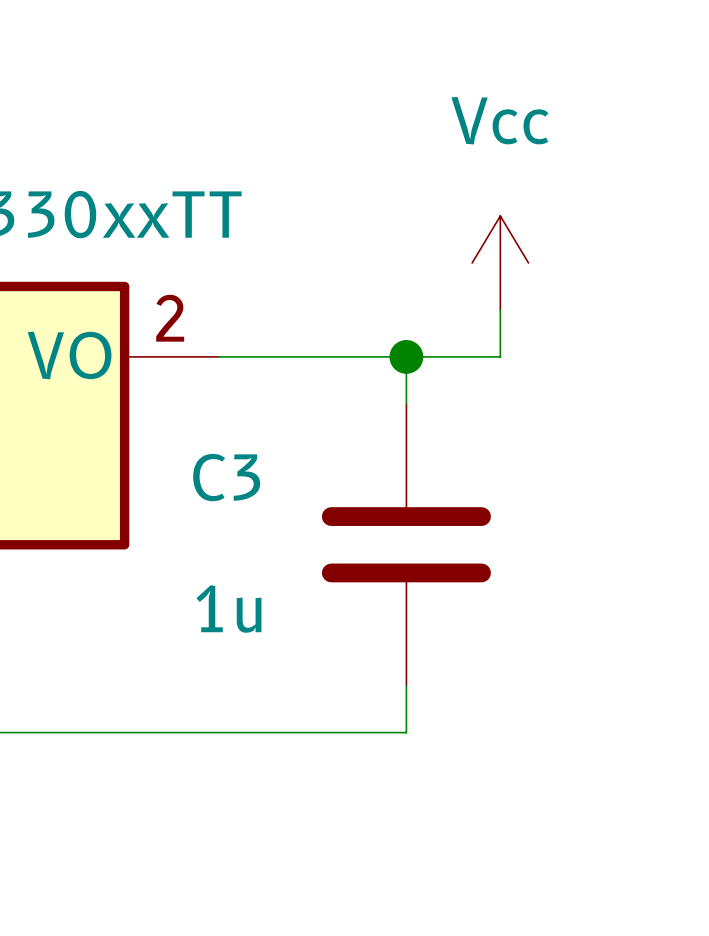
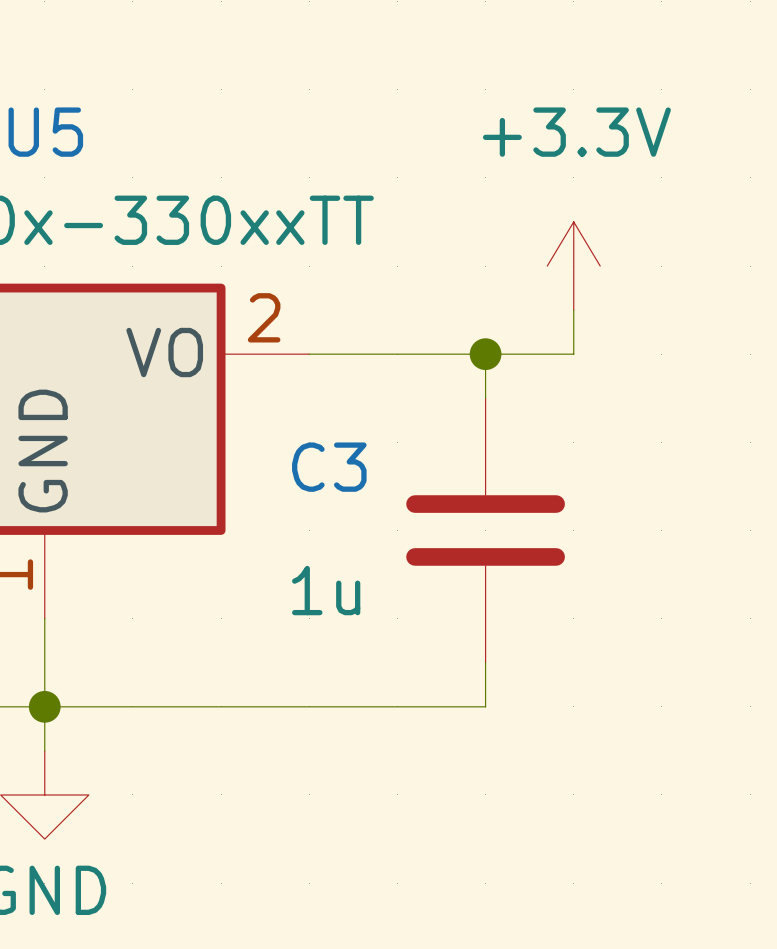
power symbol: Vcc (500, 262) -> +3.3V (573, 266)

